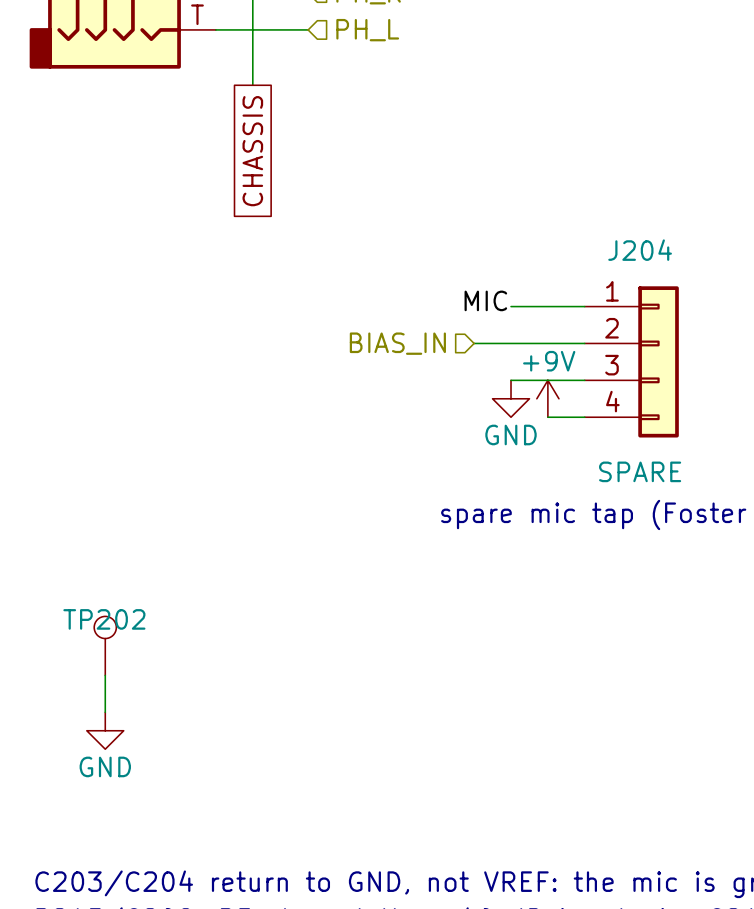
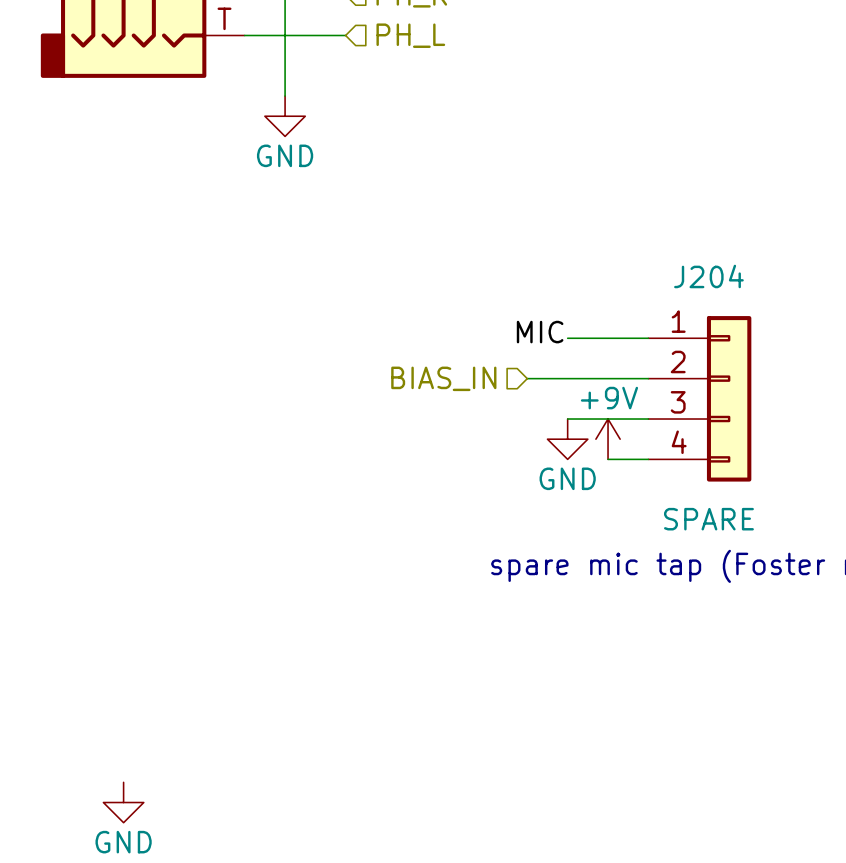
power symbol: none -> GND (285, 116)
global label: CHASSIS (252, 151) -> none
TP202: (105, 645) -> none
wire: (105, 675) (105, 712) -> none

